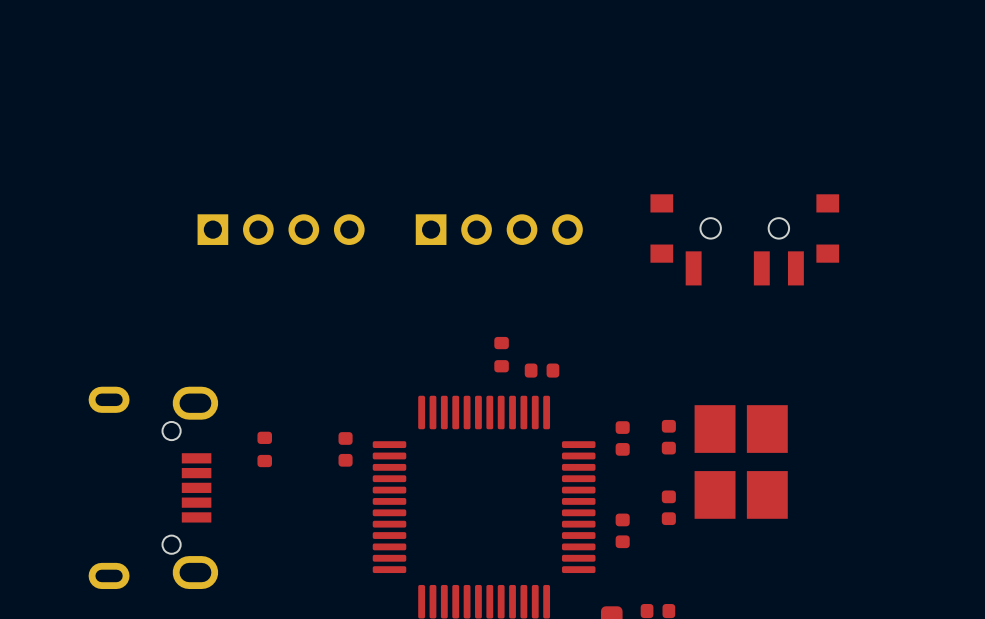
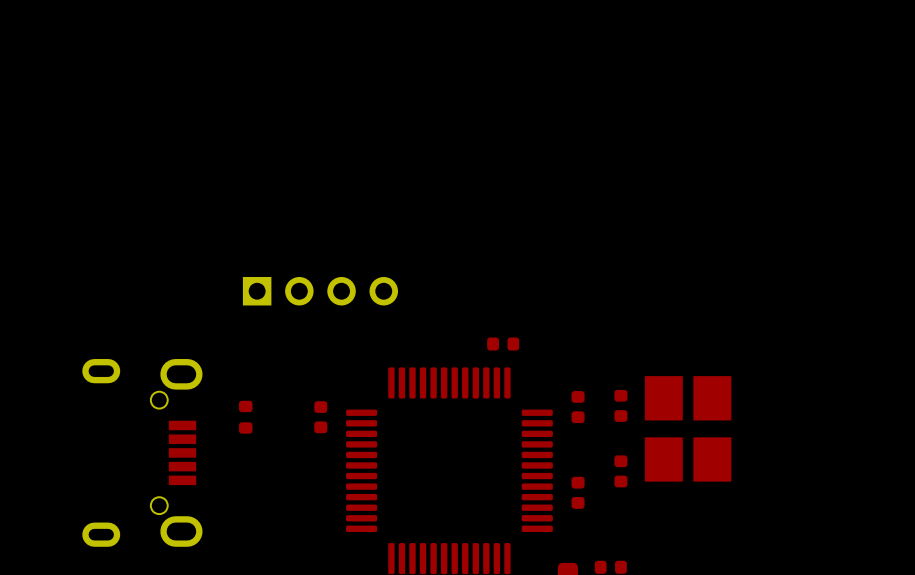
part: (281, 229) -> none
part: (499, 229) -> none
part: (744, 239) -> none
part: none -> (320, 291)
part: (501, 354) -> none

